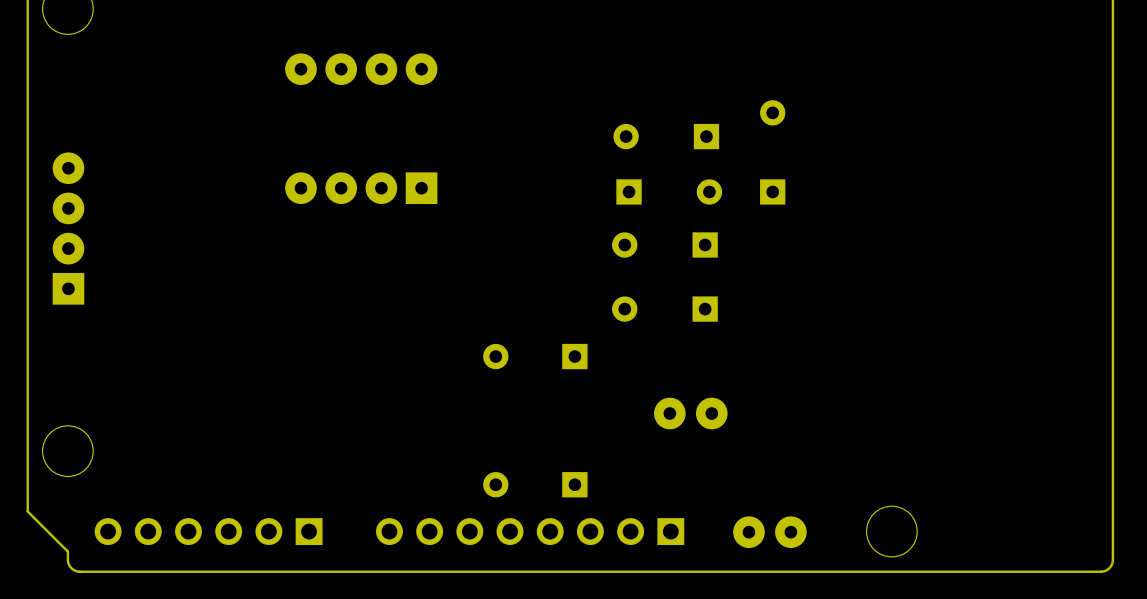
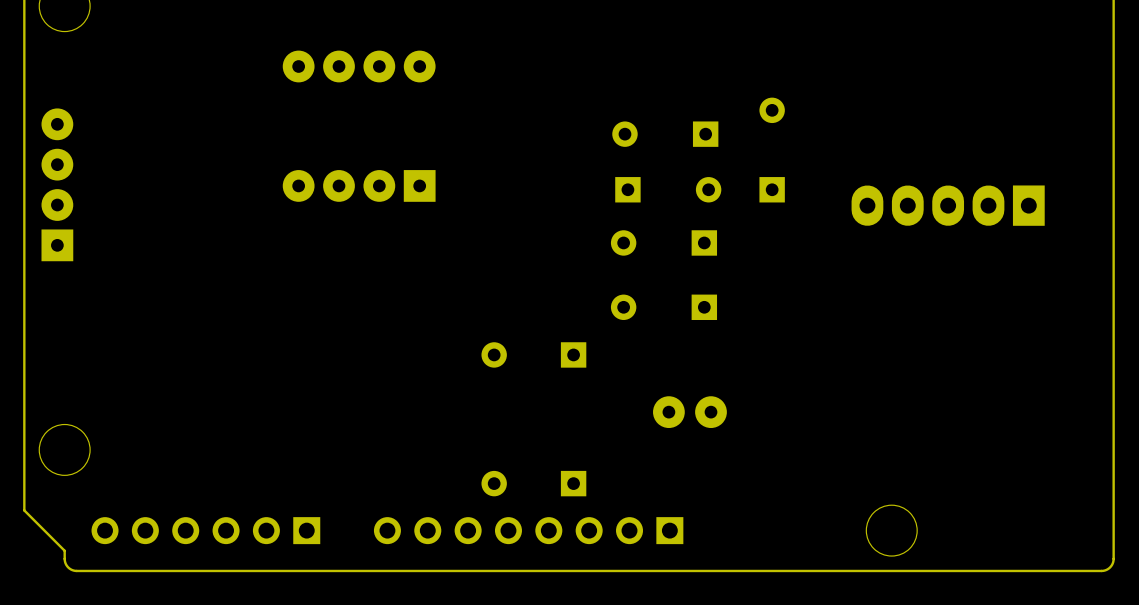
part: none -> (948, 205)
part position: (68, 228) -> (57, 184)
part: (769, 532) -> none

